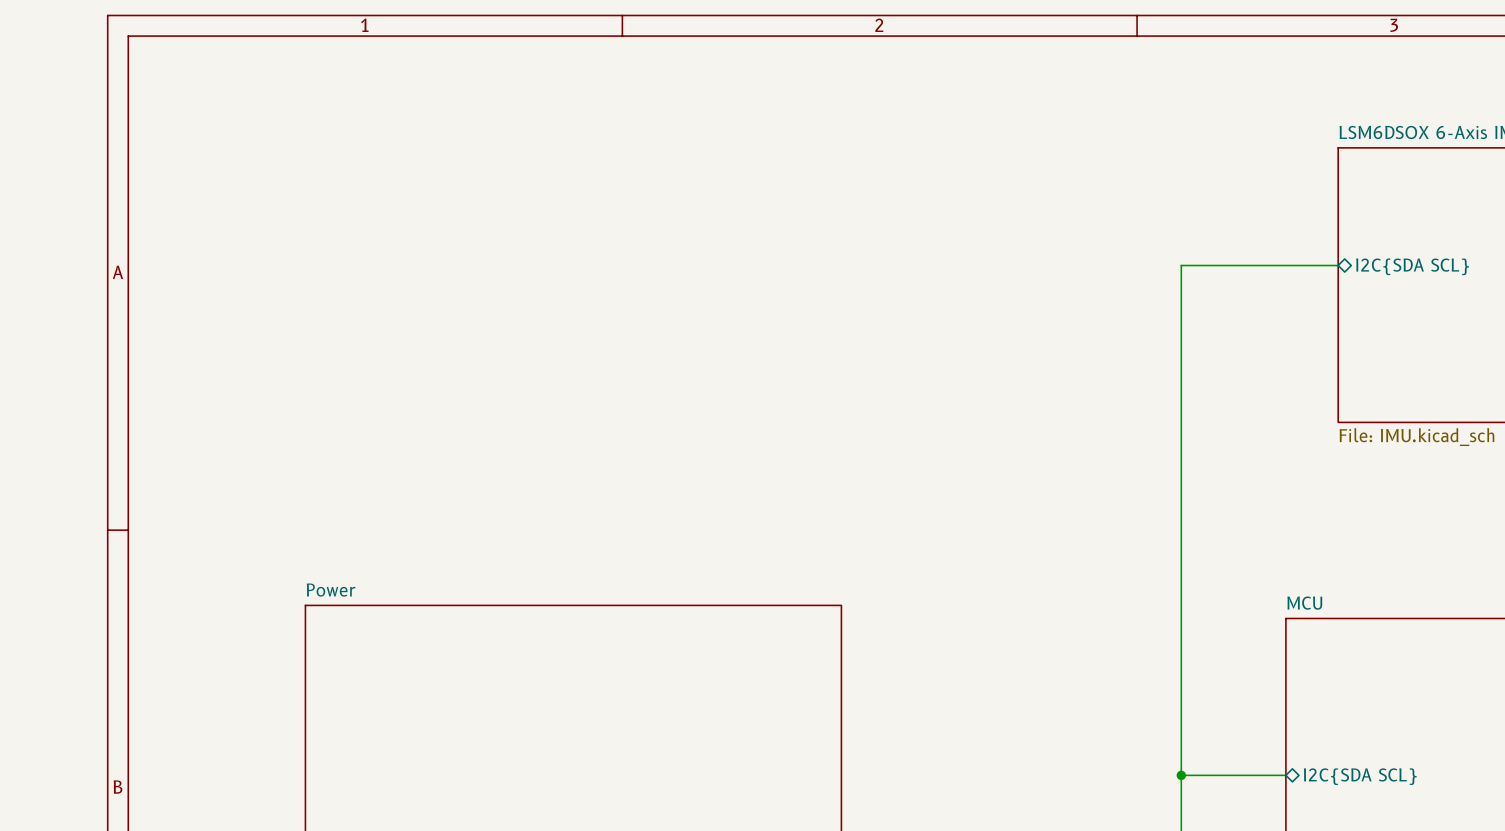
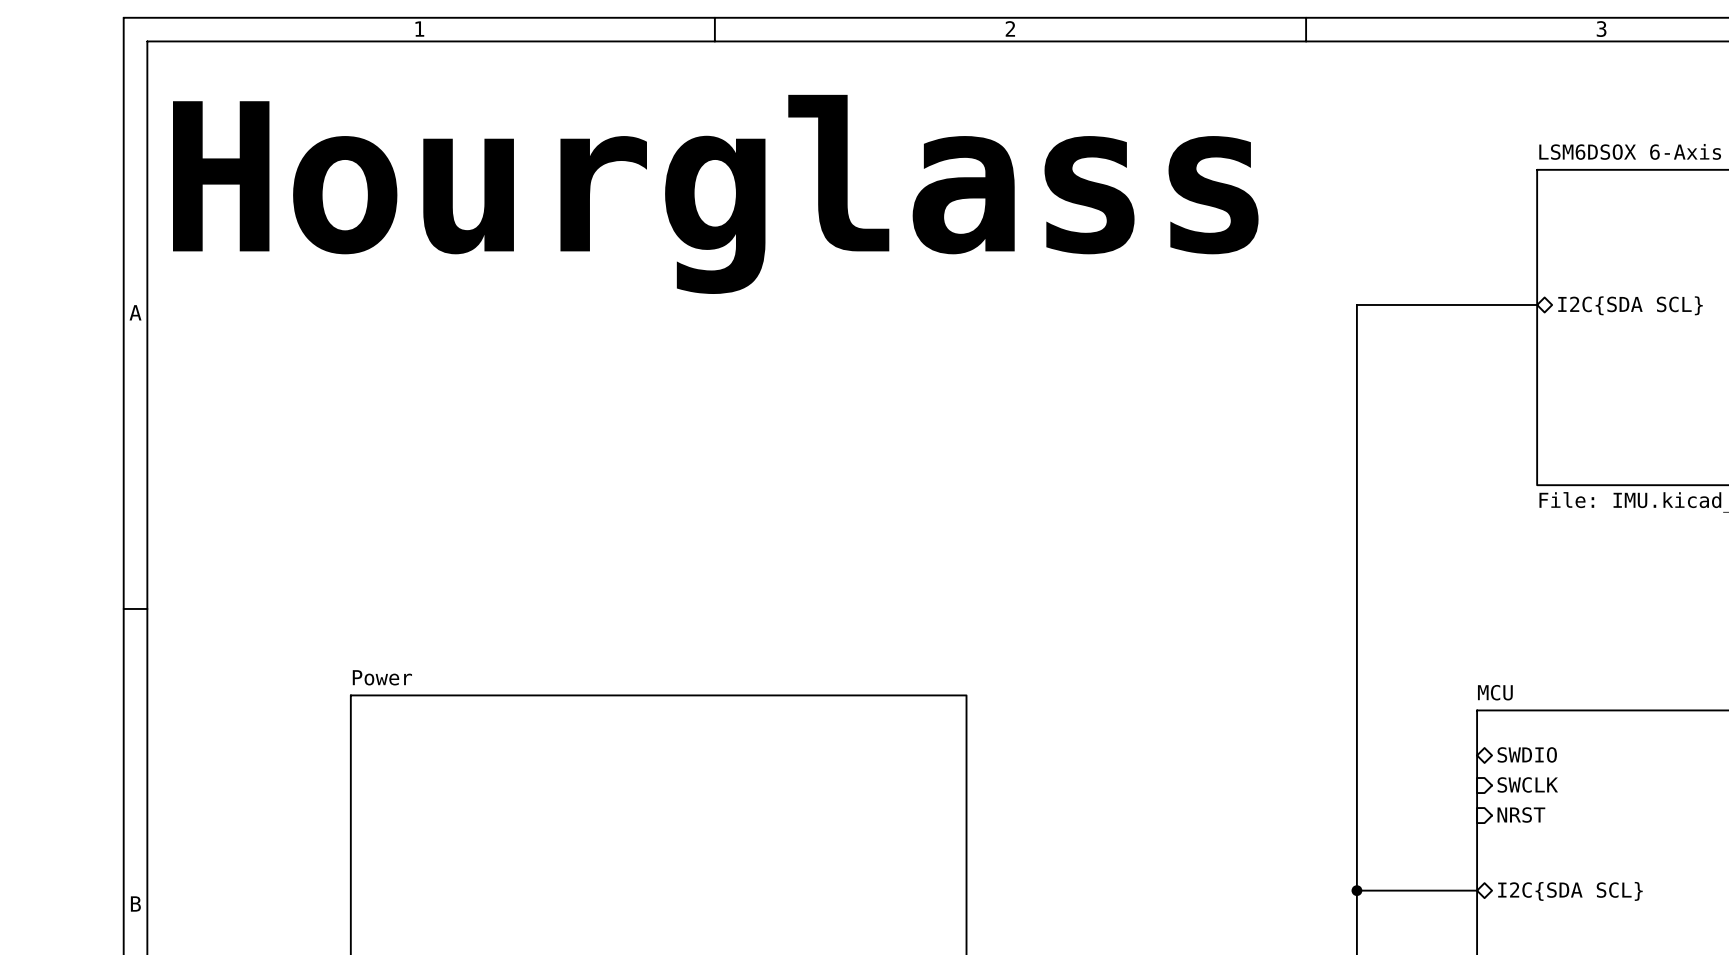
text: none -> Hourglass (715, 194)
sheet pin: none -> SWDIO (1527, 754)
sheet pin: none -> SWCLK (1527, 784)
sheet pin: none -> NRST (1521, 815)

